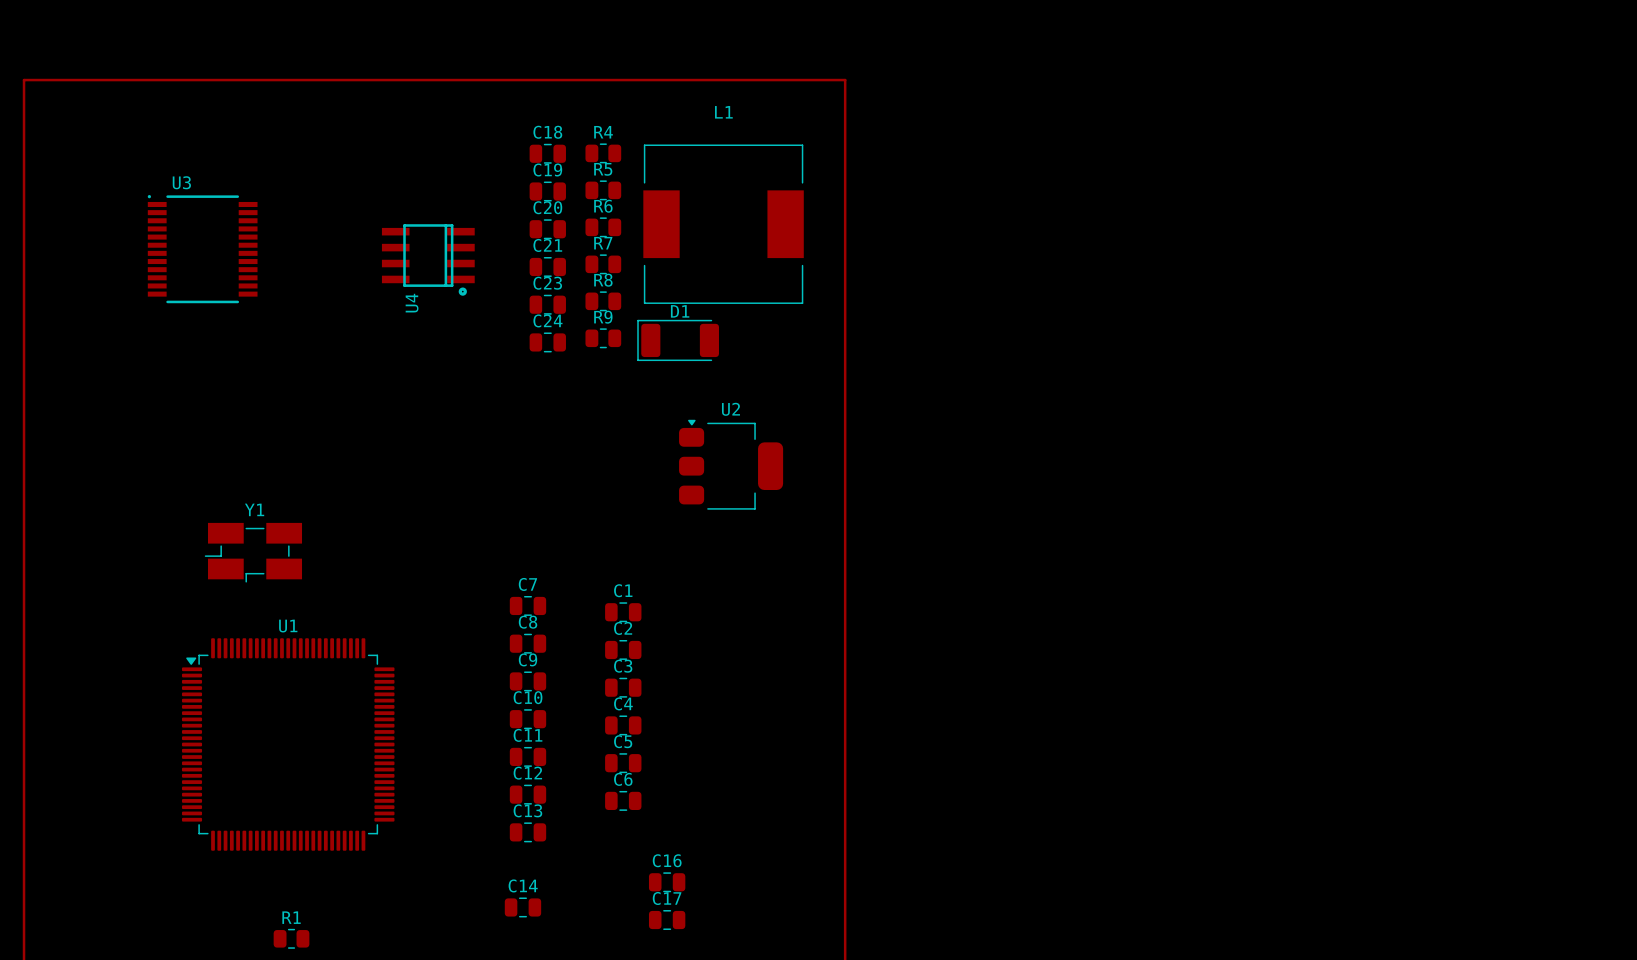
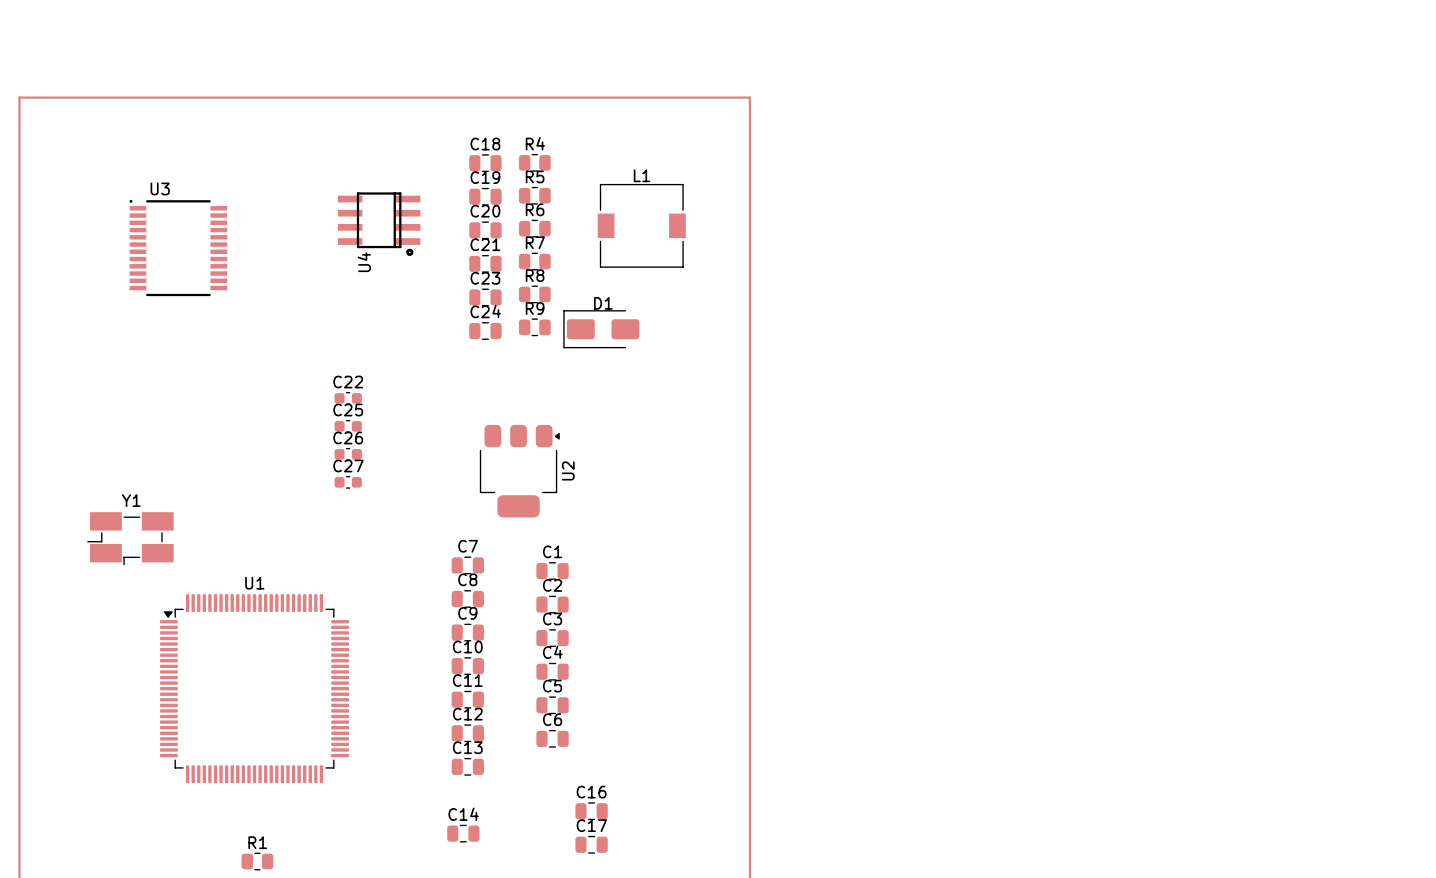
L1 name position: L1 (723, 112) -> L1 (642, 175)
L1 footprint: [643, 144, 804, 304] -> [597, 183, 686, 268]
U4 position: (428, 259) -> (379, 224)
D1 footprint: [637, 319, 719, 362] -> [563, 310, 640, 349]
C22: none -> (348, 398)
C25: none -> (348, 426)
U2 rotation: 0° (731, 464) -> 90° clockwise (519, 471)
U2 position: (731, 464) -> (519, 471)
C26: none -> (348, 454)
C27: none -> (348, 482)
Y1 position: (253, 552) -> (130, 538)

